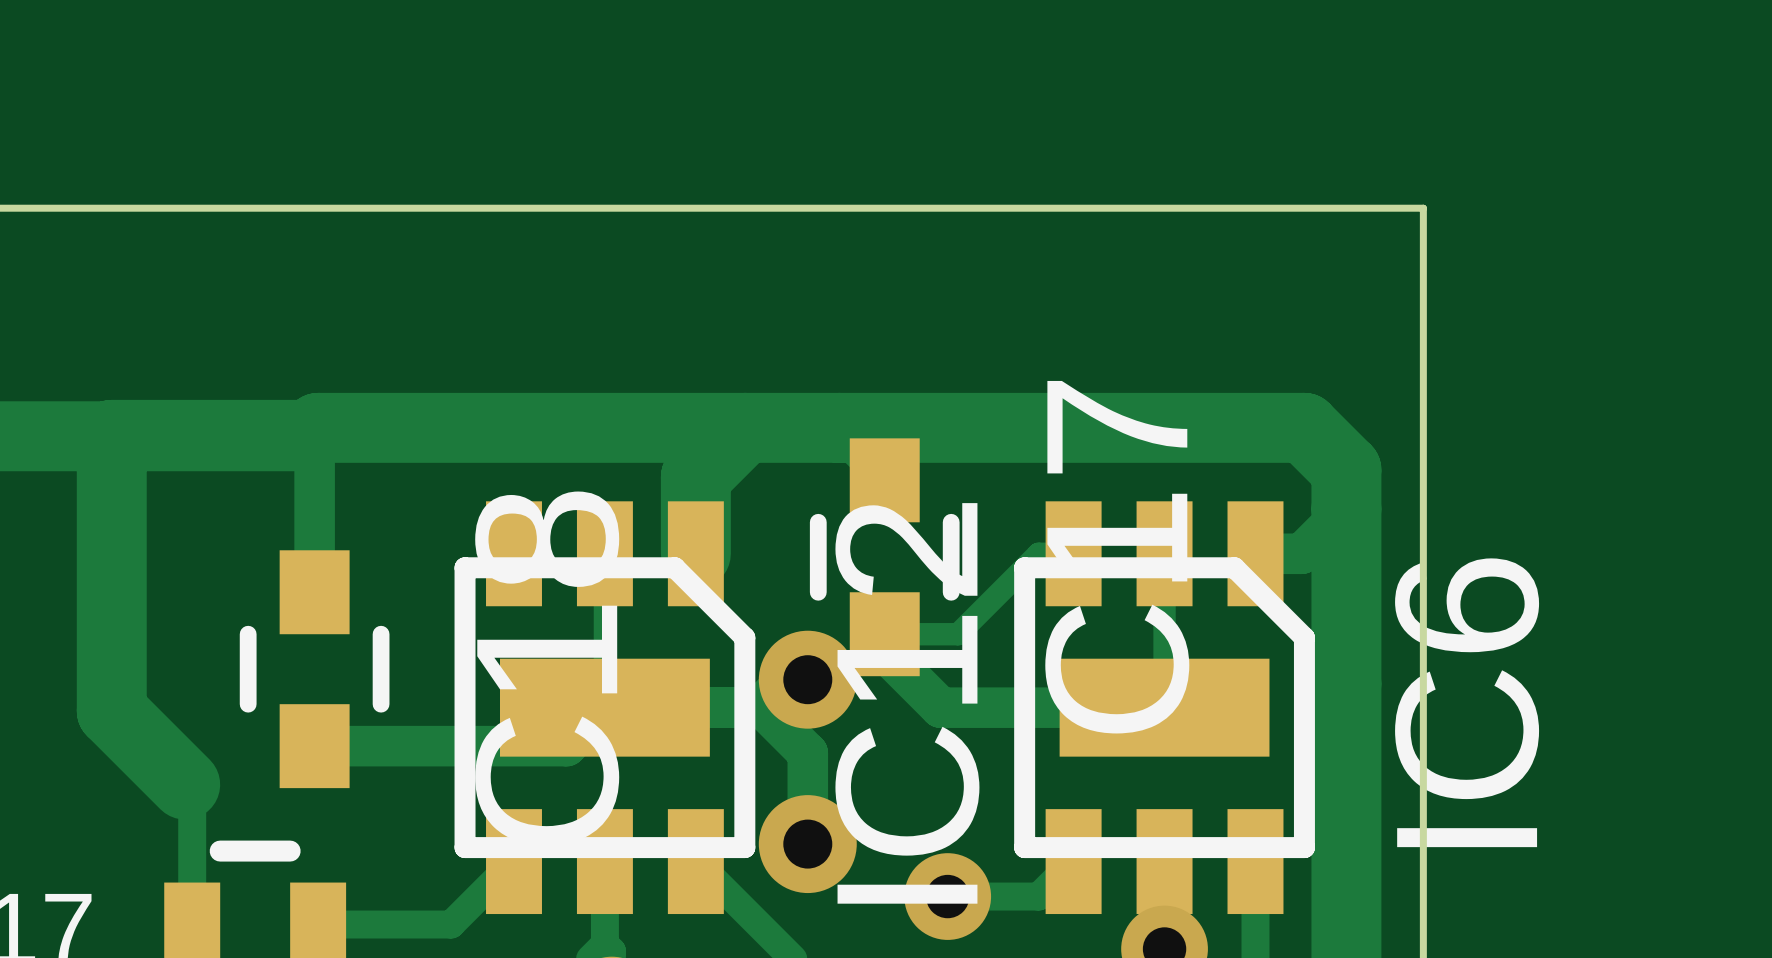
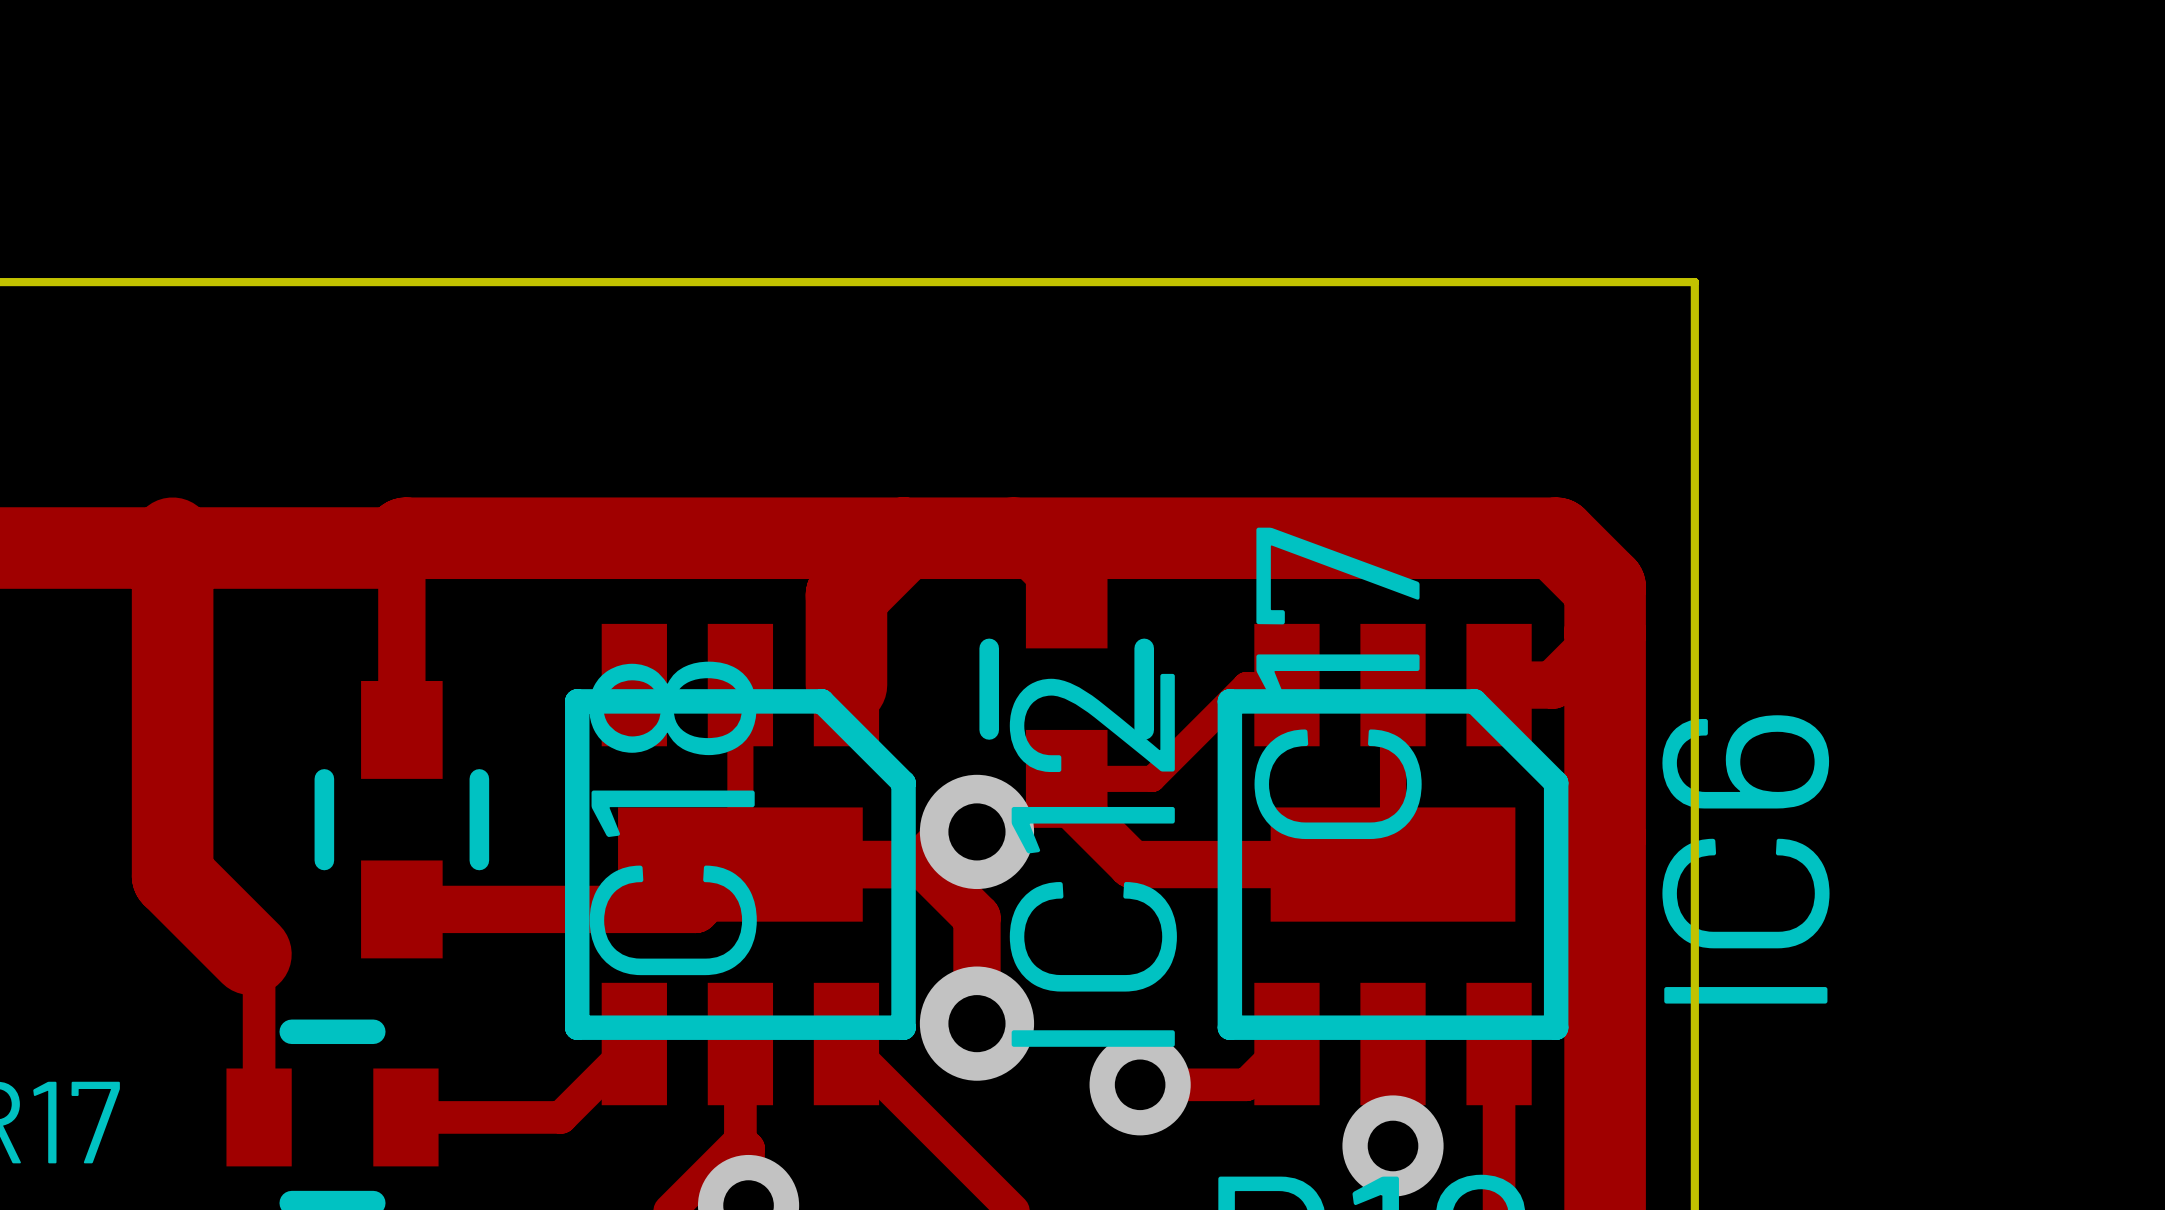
track: (308, 434) (111, 434) (111, 711) (118, 717) -> (172, 538) (172, 875)

